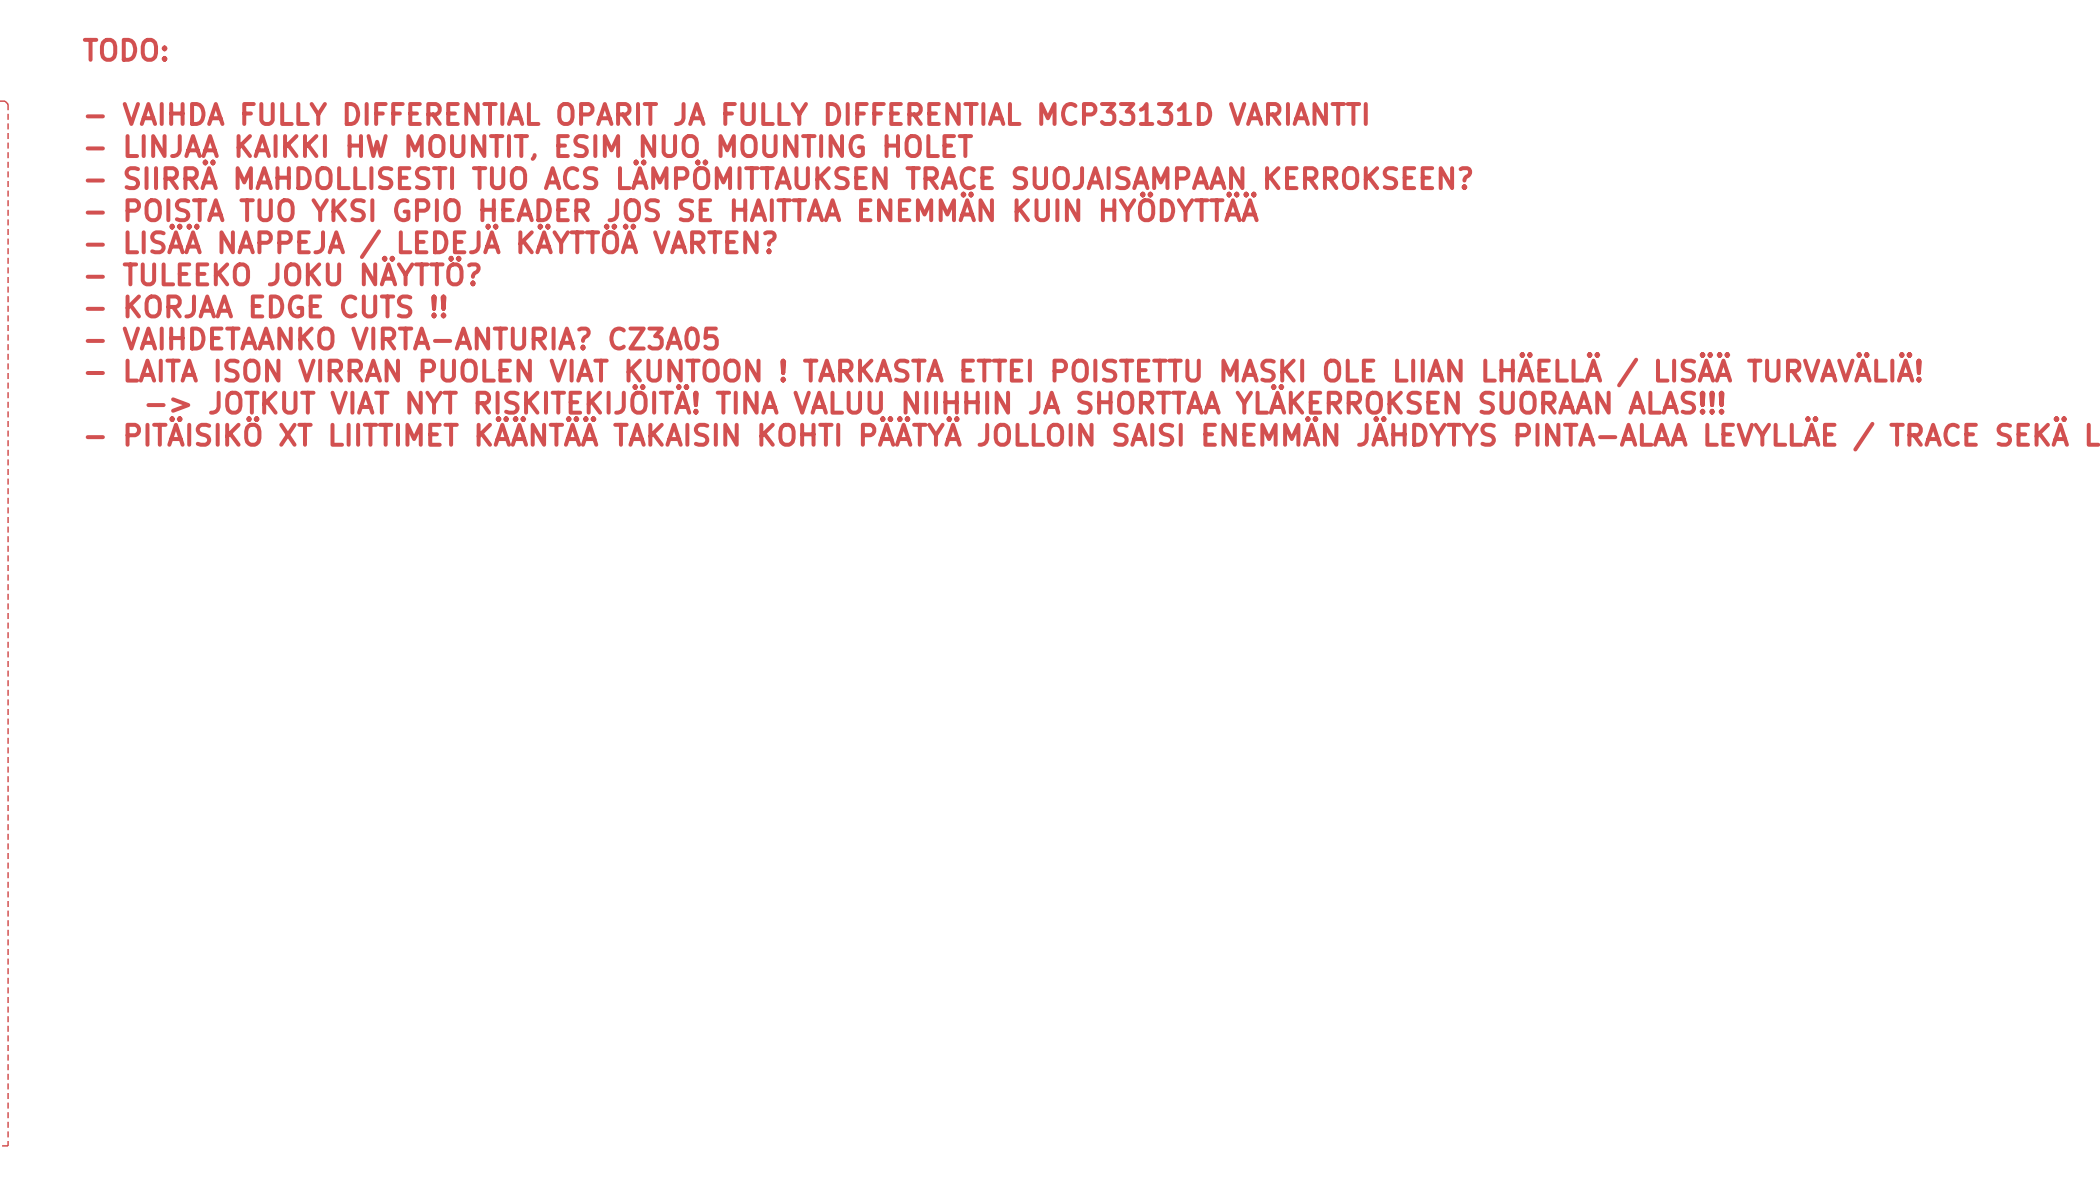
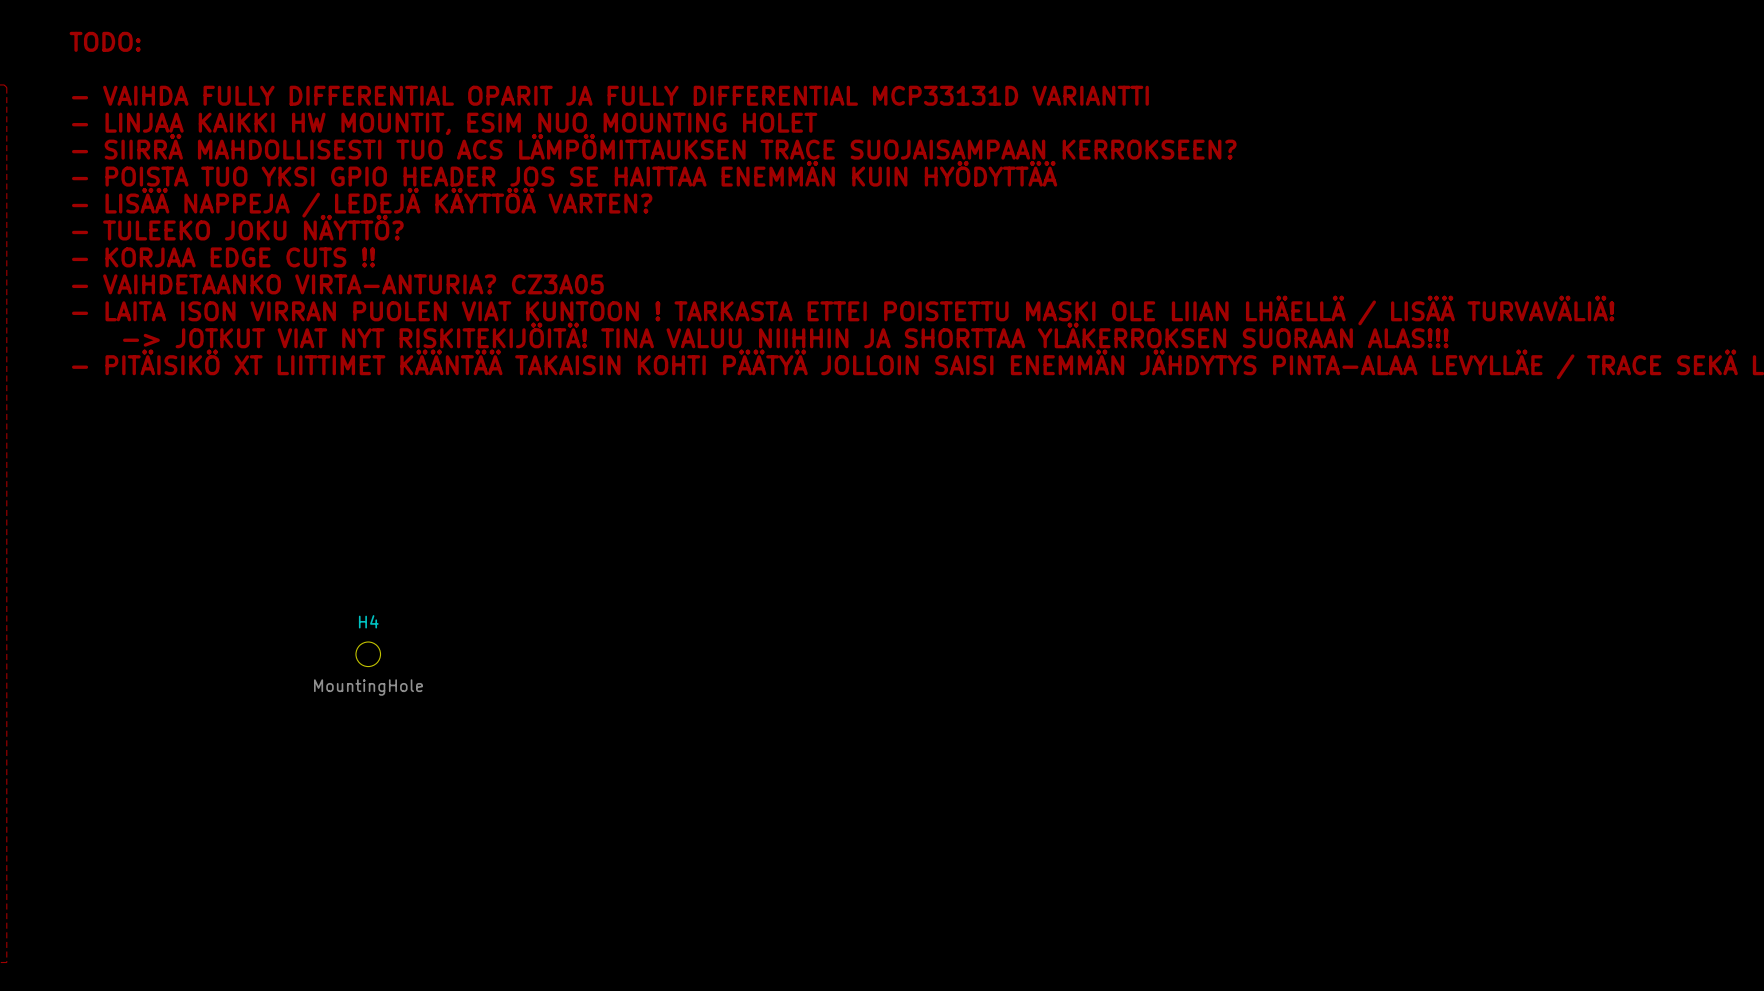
H4: none -> MountingHole (368, 654)

